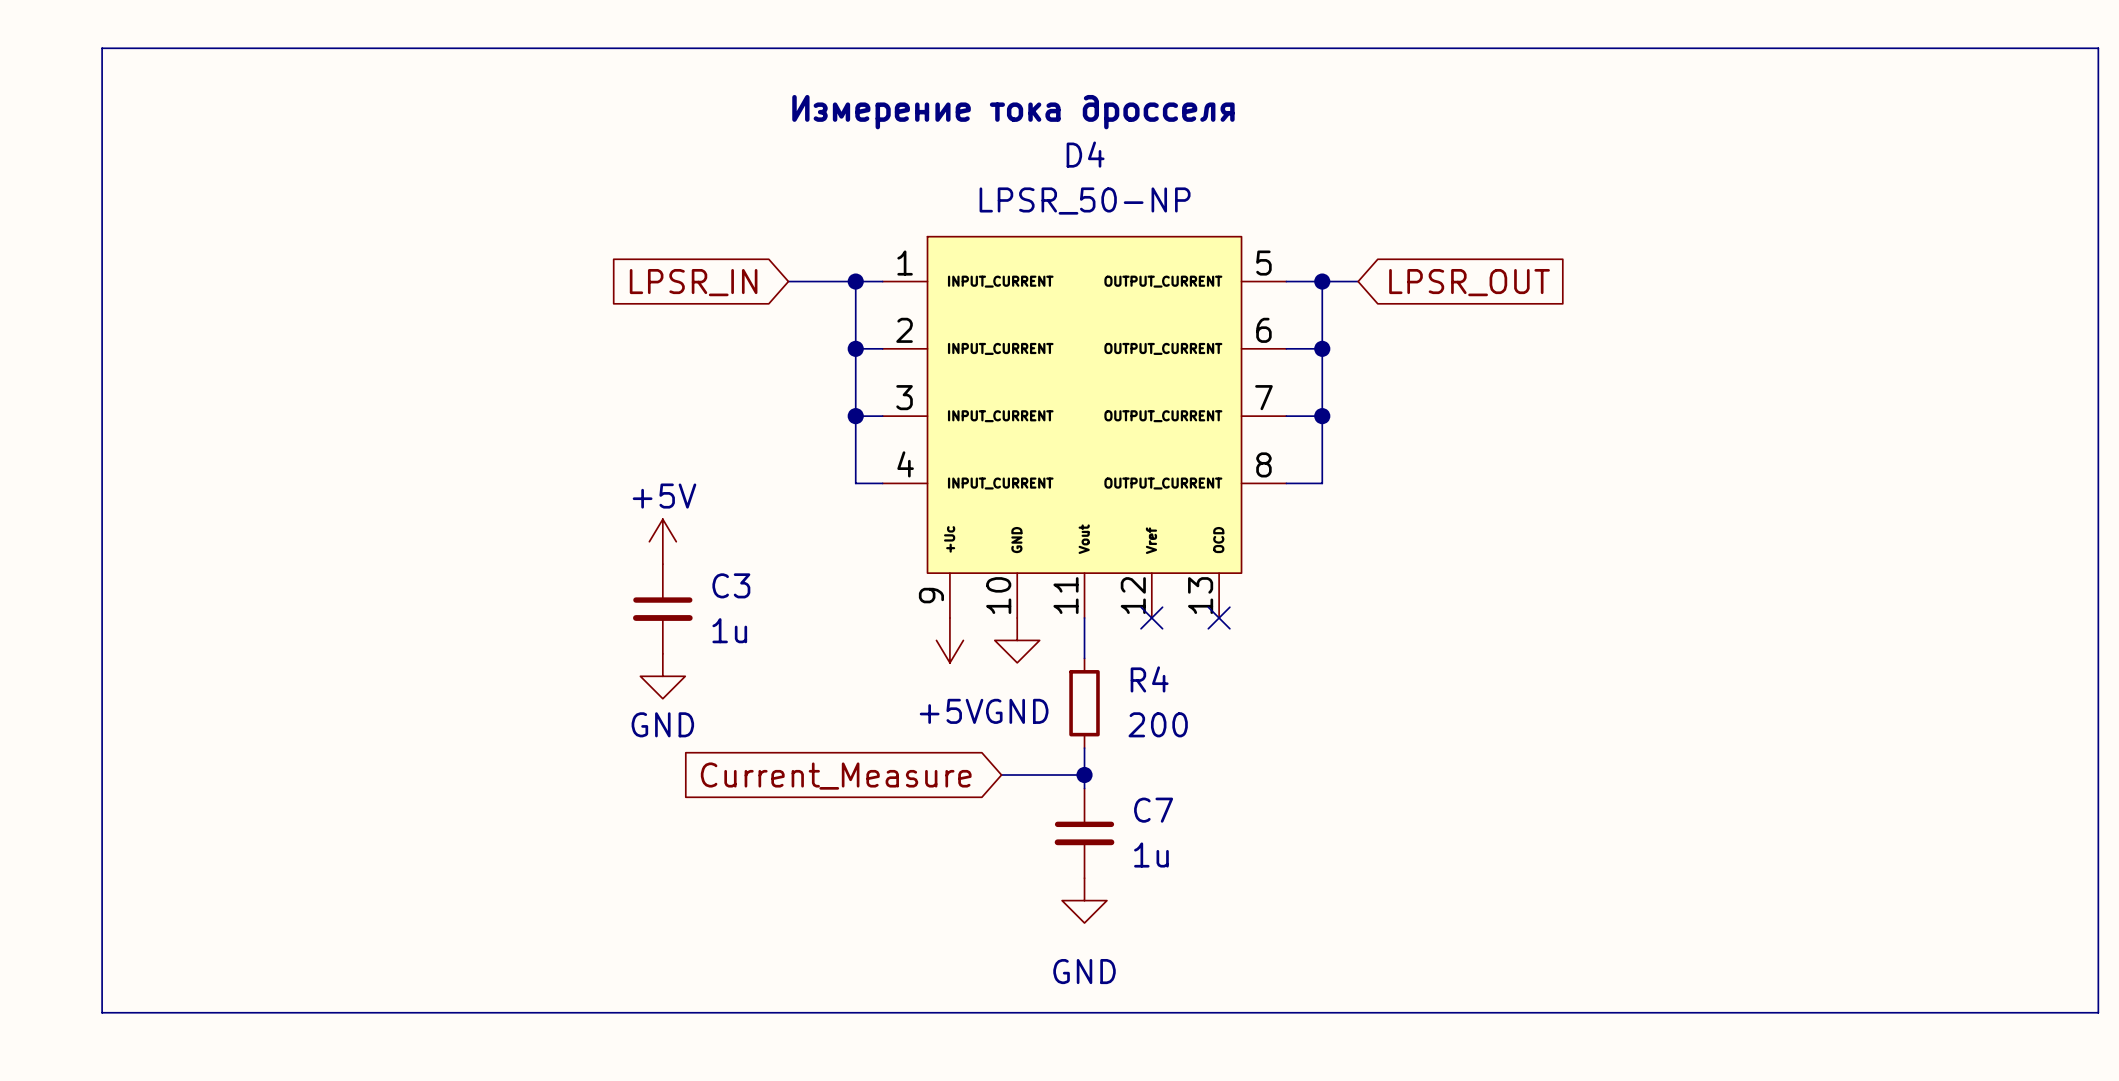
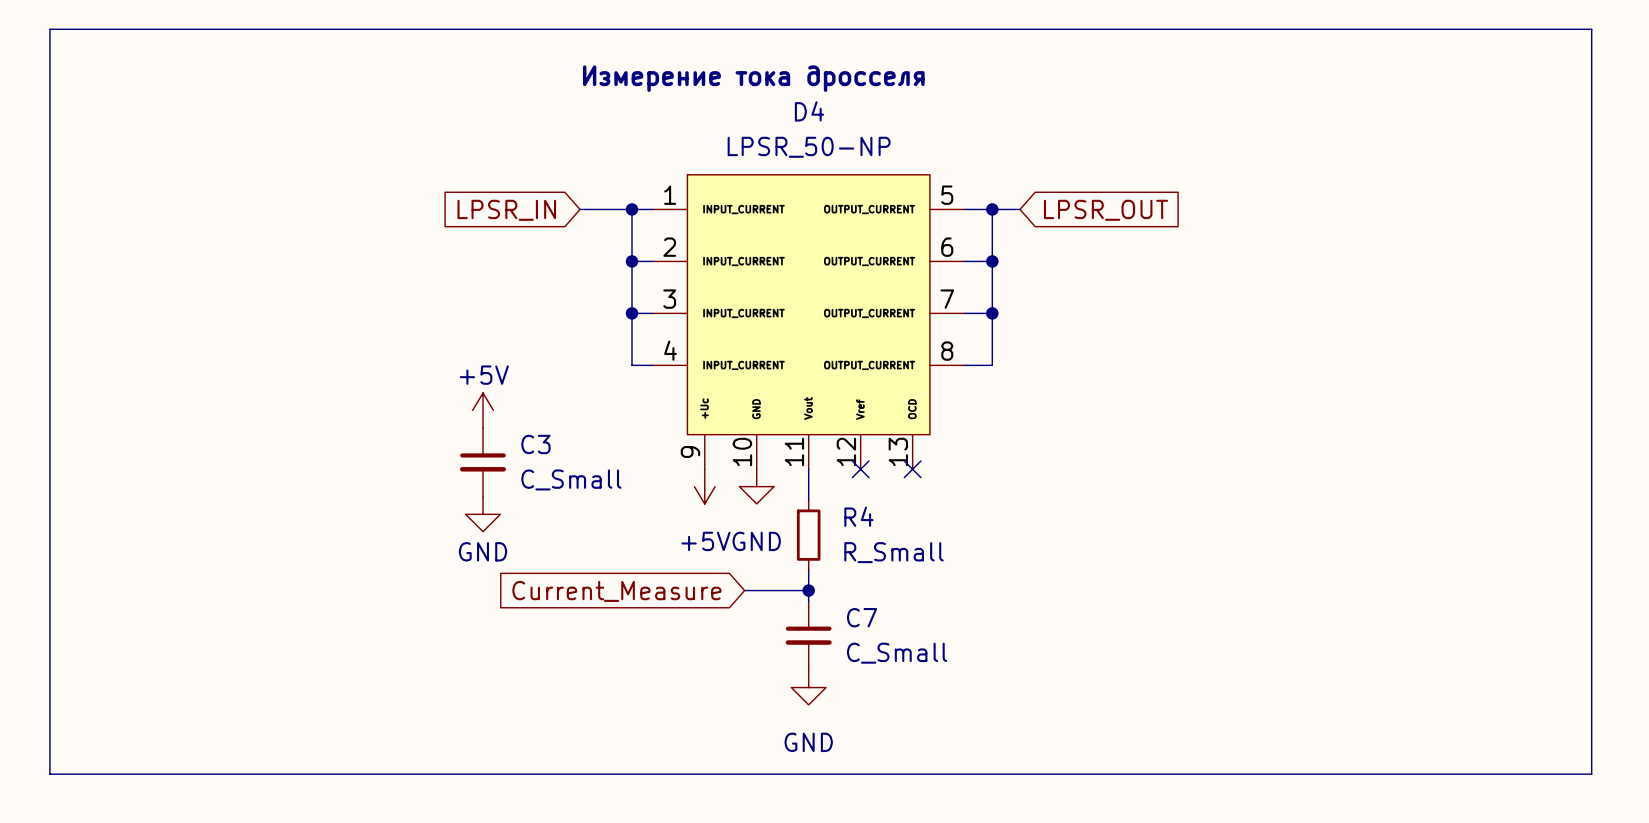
C3 value: 1u (729, 630) -> C_Small (571, 479)
R4 value: 200 (1158, 724) -> R_Small (894, 552)
C7 value: 1u (1151, 855) -> C_Small (897, 653)

